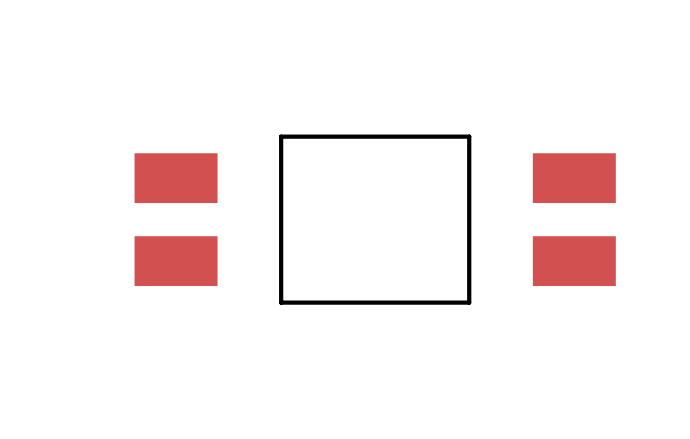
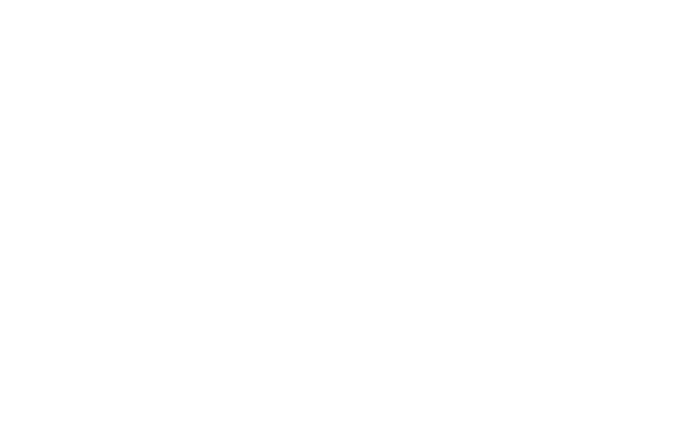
part: (375, 219) -> none

